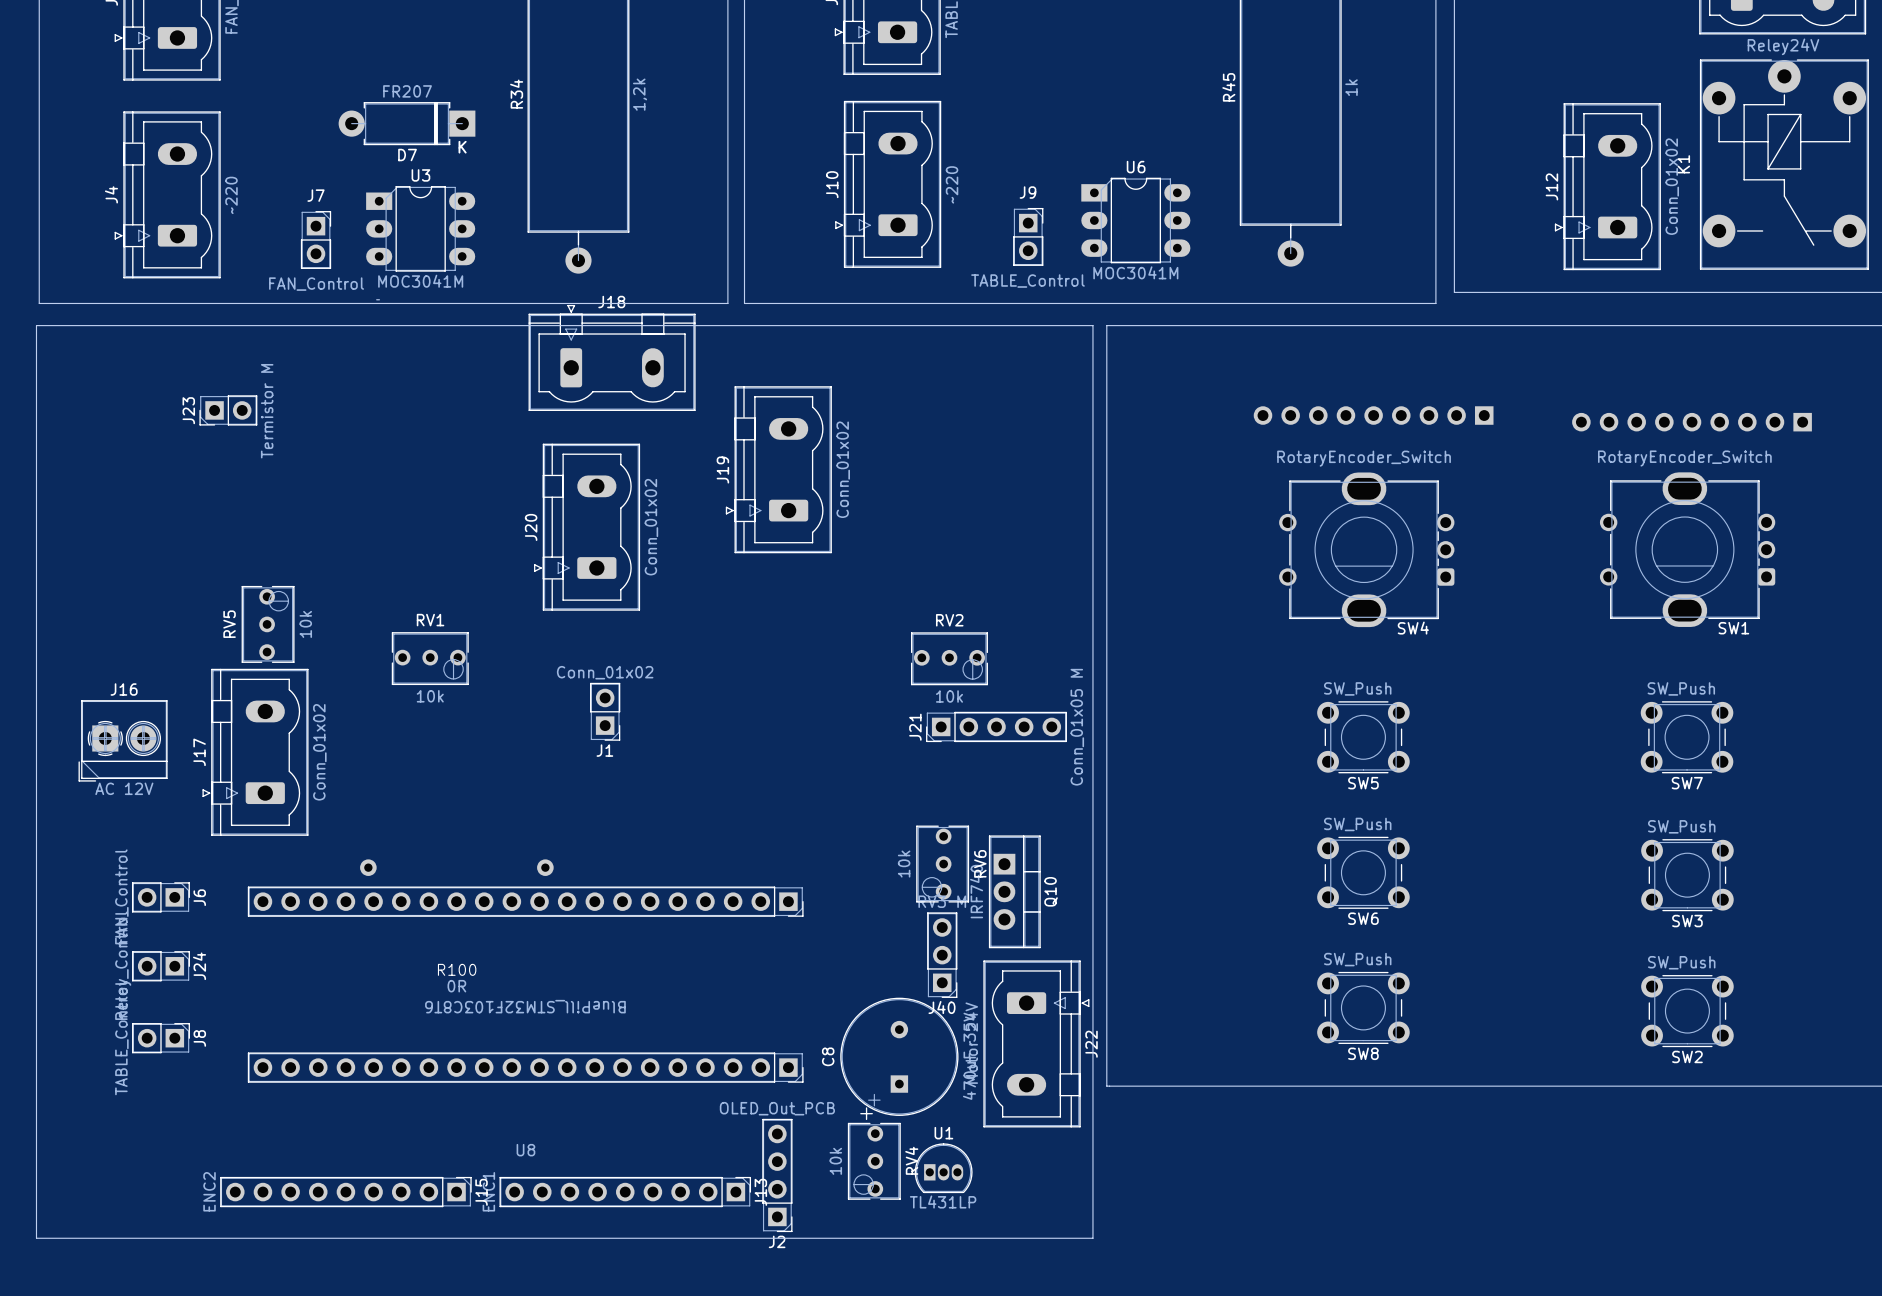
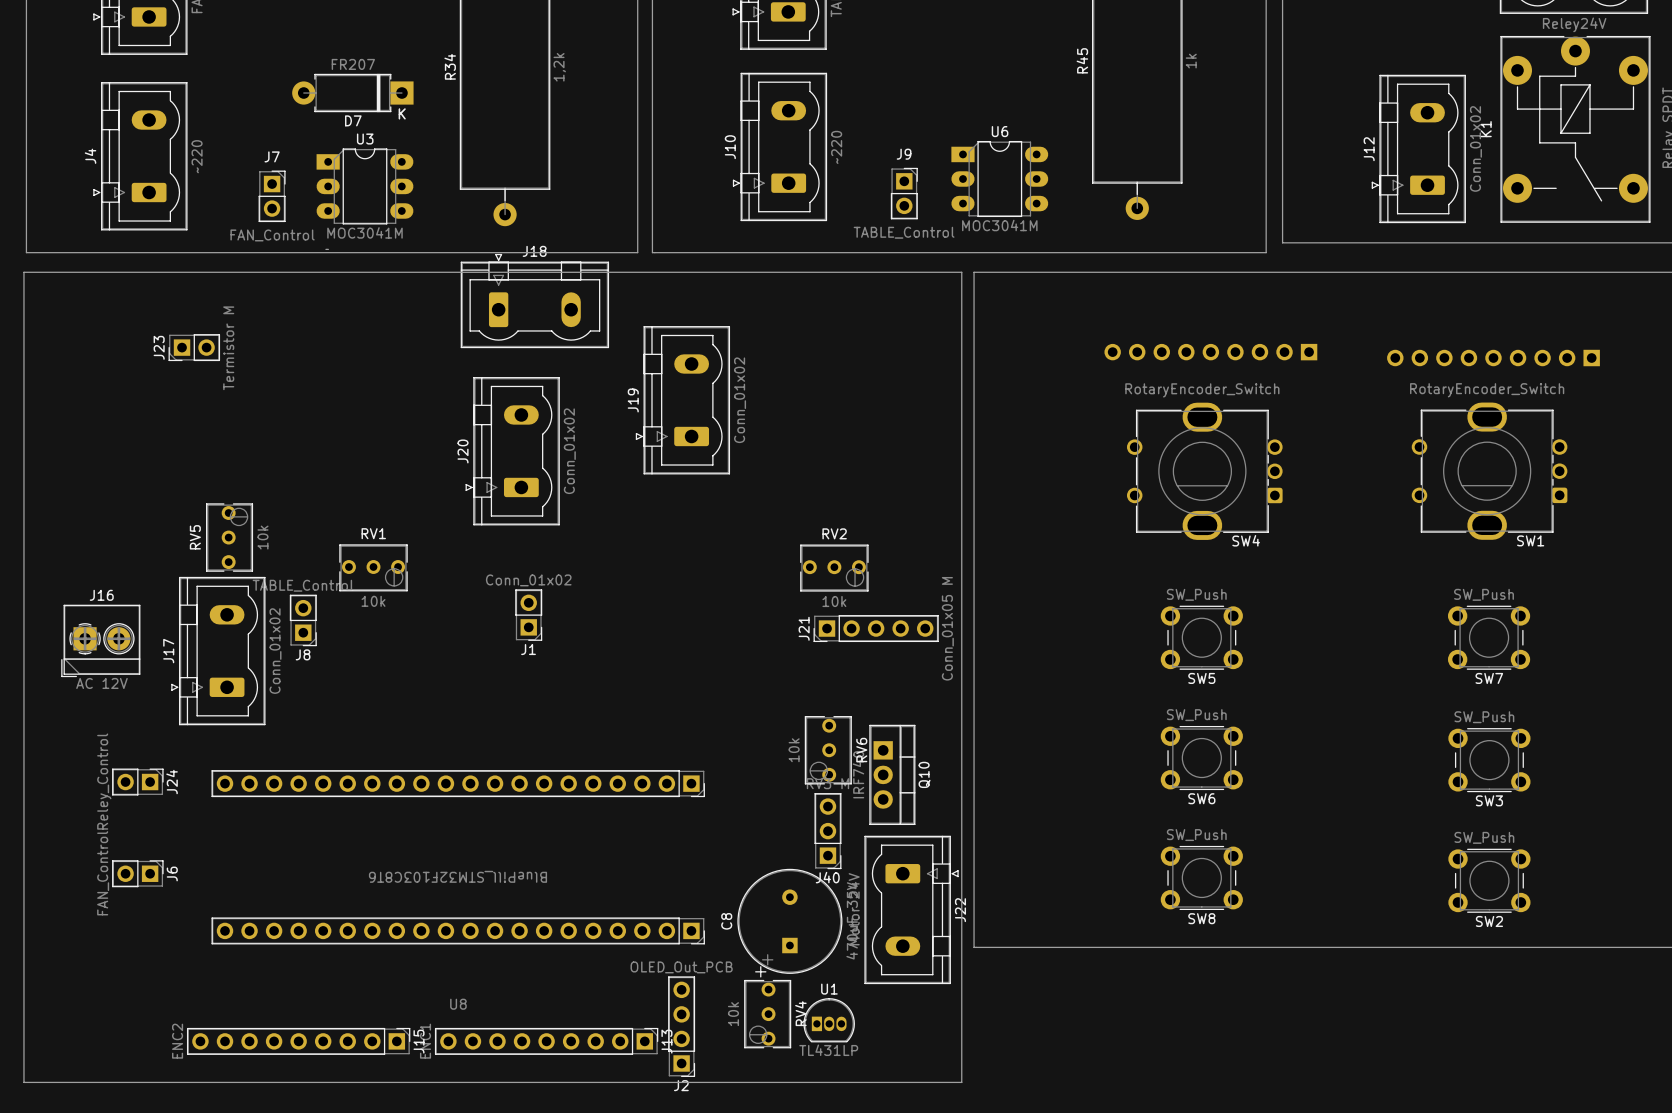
R100: 0R (456, 867) -> none
J6 position: (160, 897) -> (137, 873)
J24 position: (161, 966) -> (137, 782)
J8 rotation: 0° (161, 1038) -> 90° clockwise (303, 620)
J8 position: (161, 1038) -> (303, 620)

